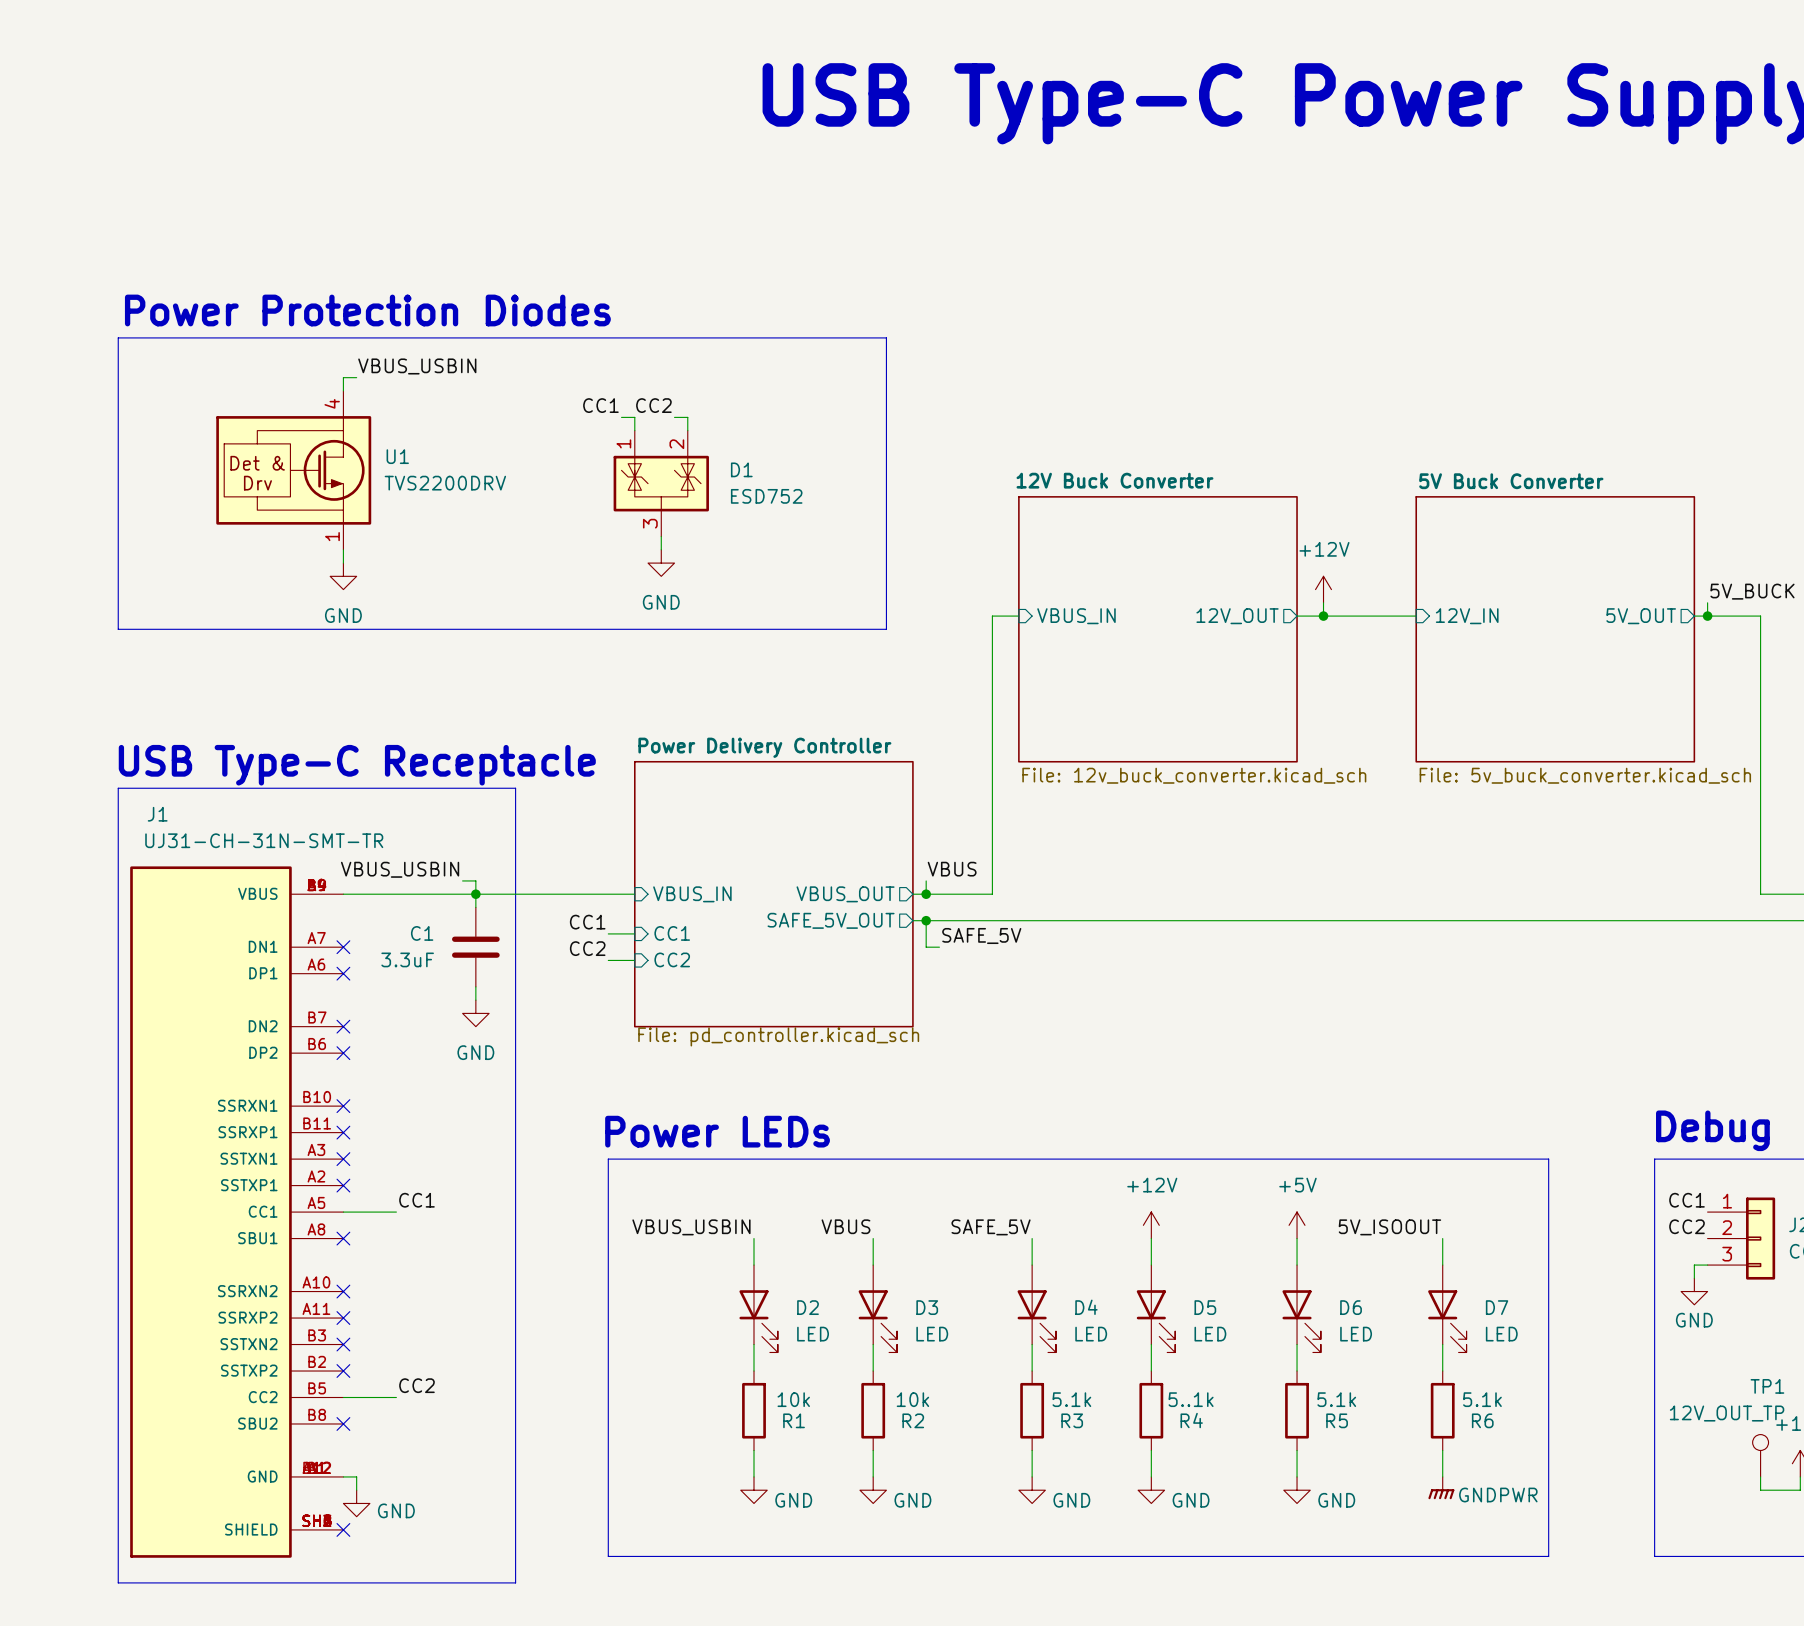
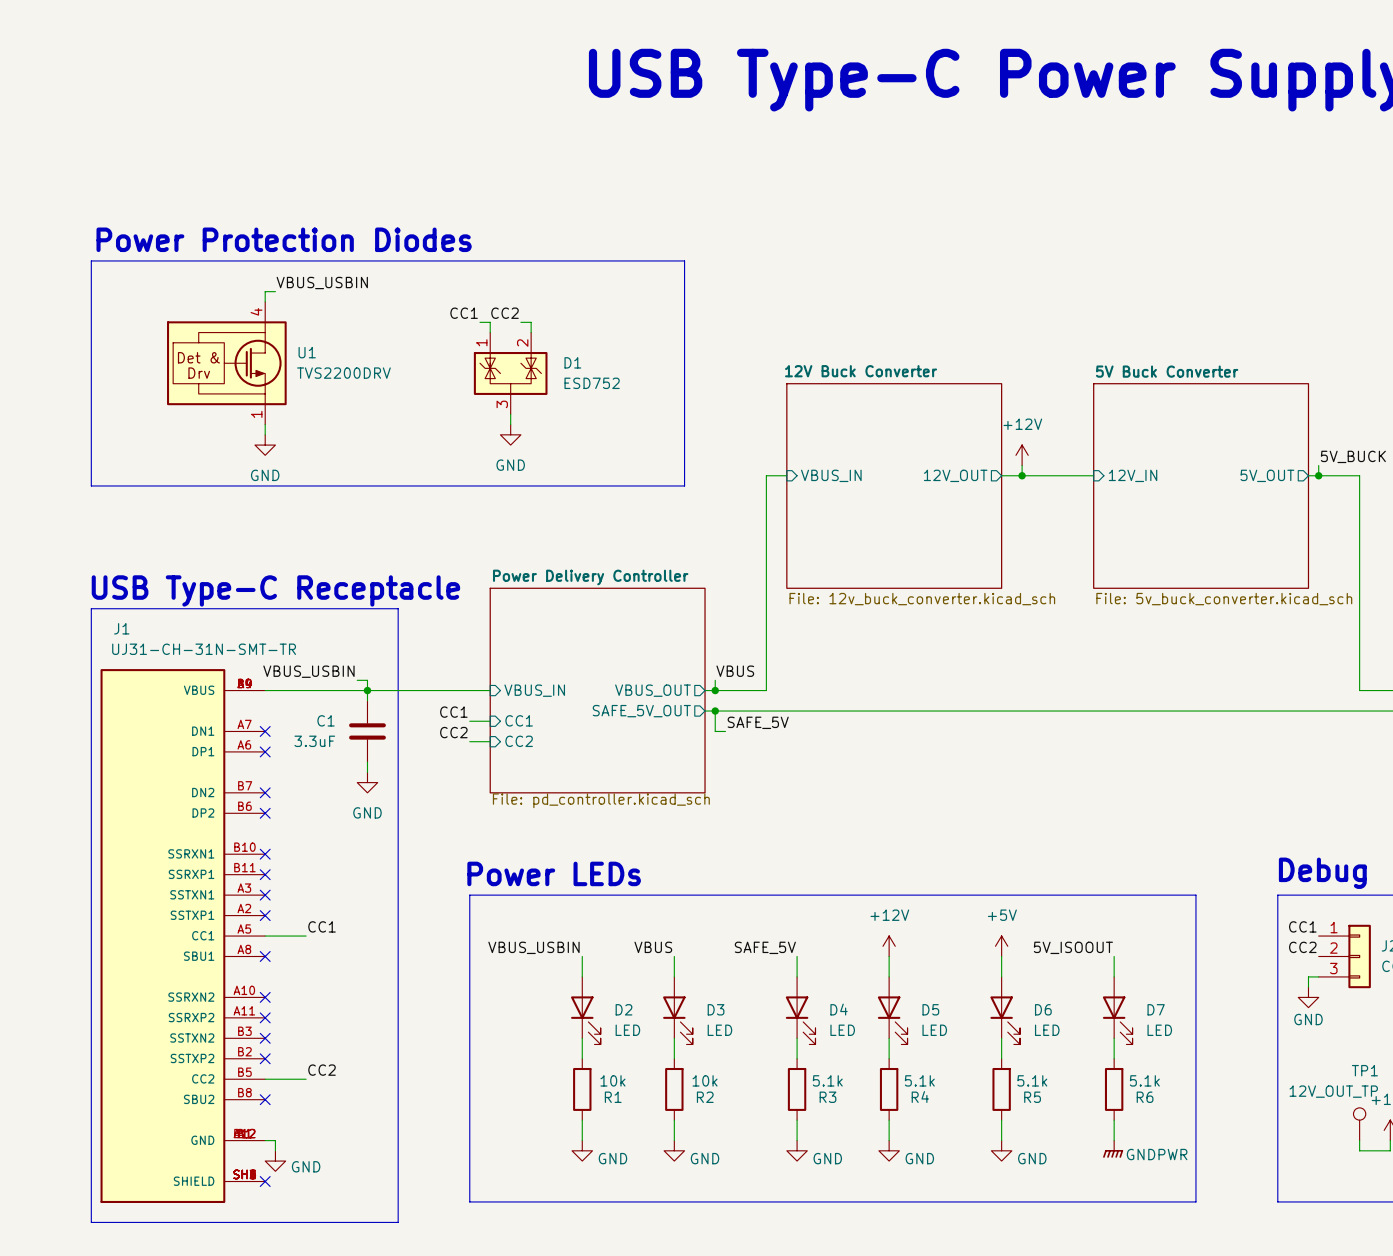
R4 value: 5..1k (1191, 1399) -> 5.1k (919, 1080)

